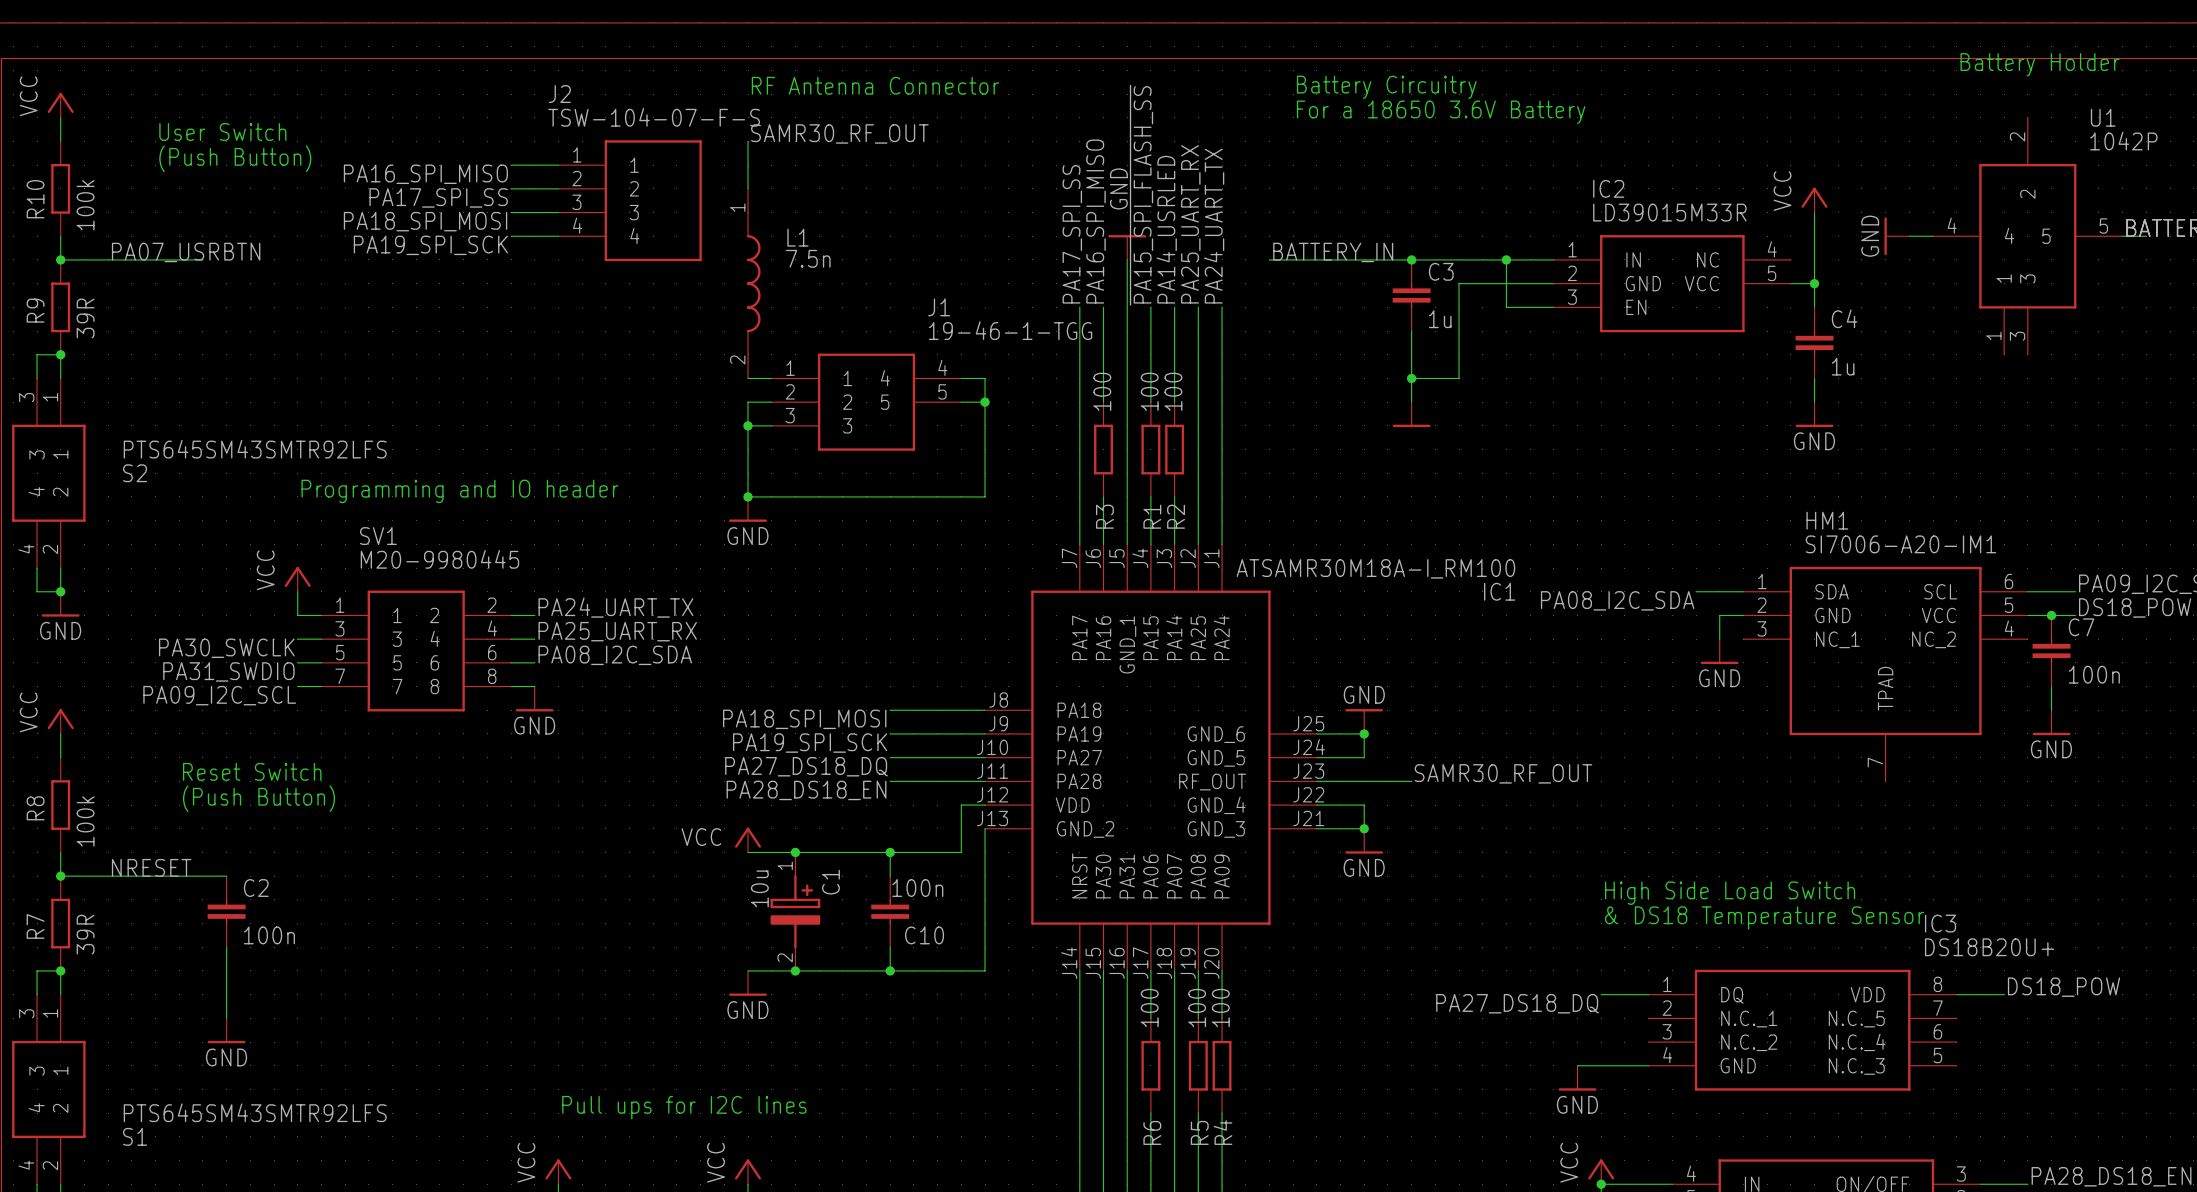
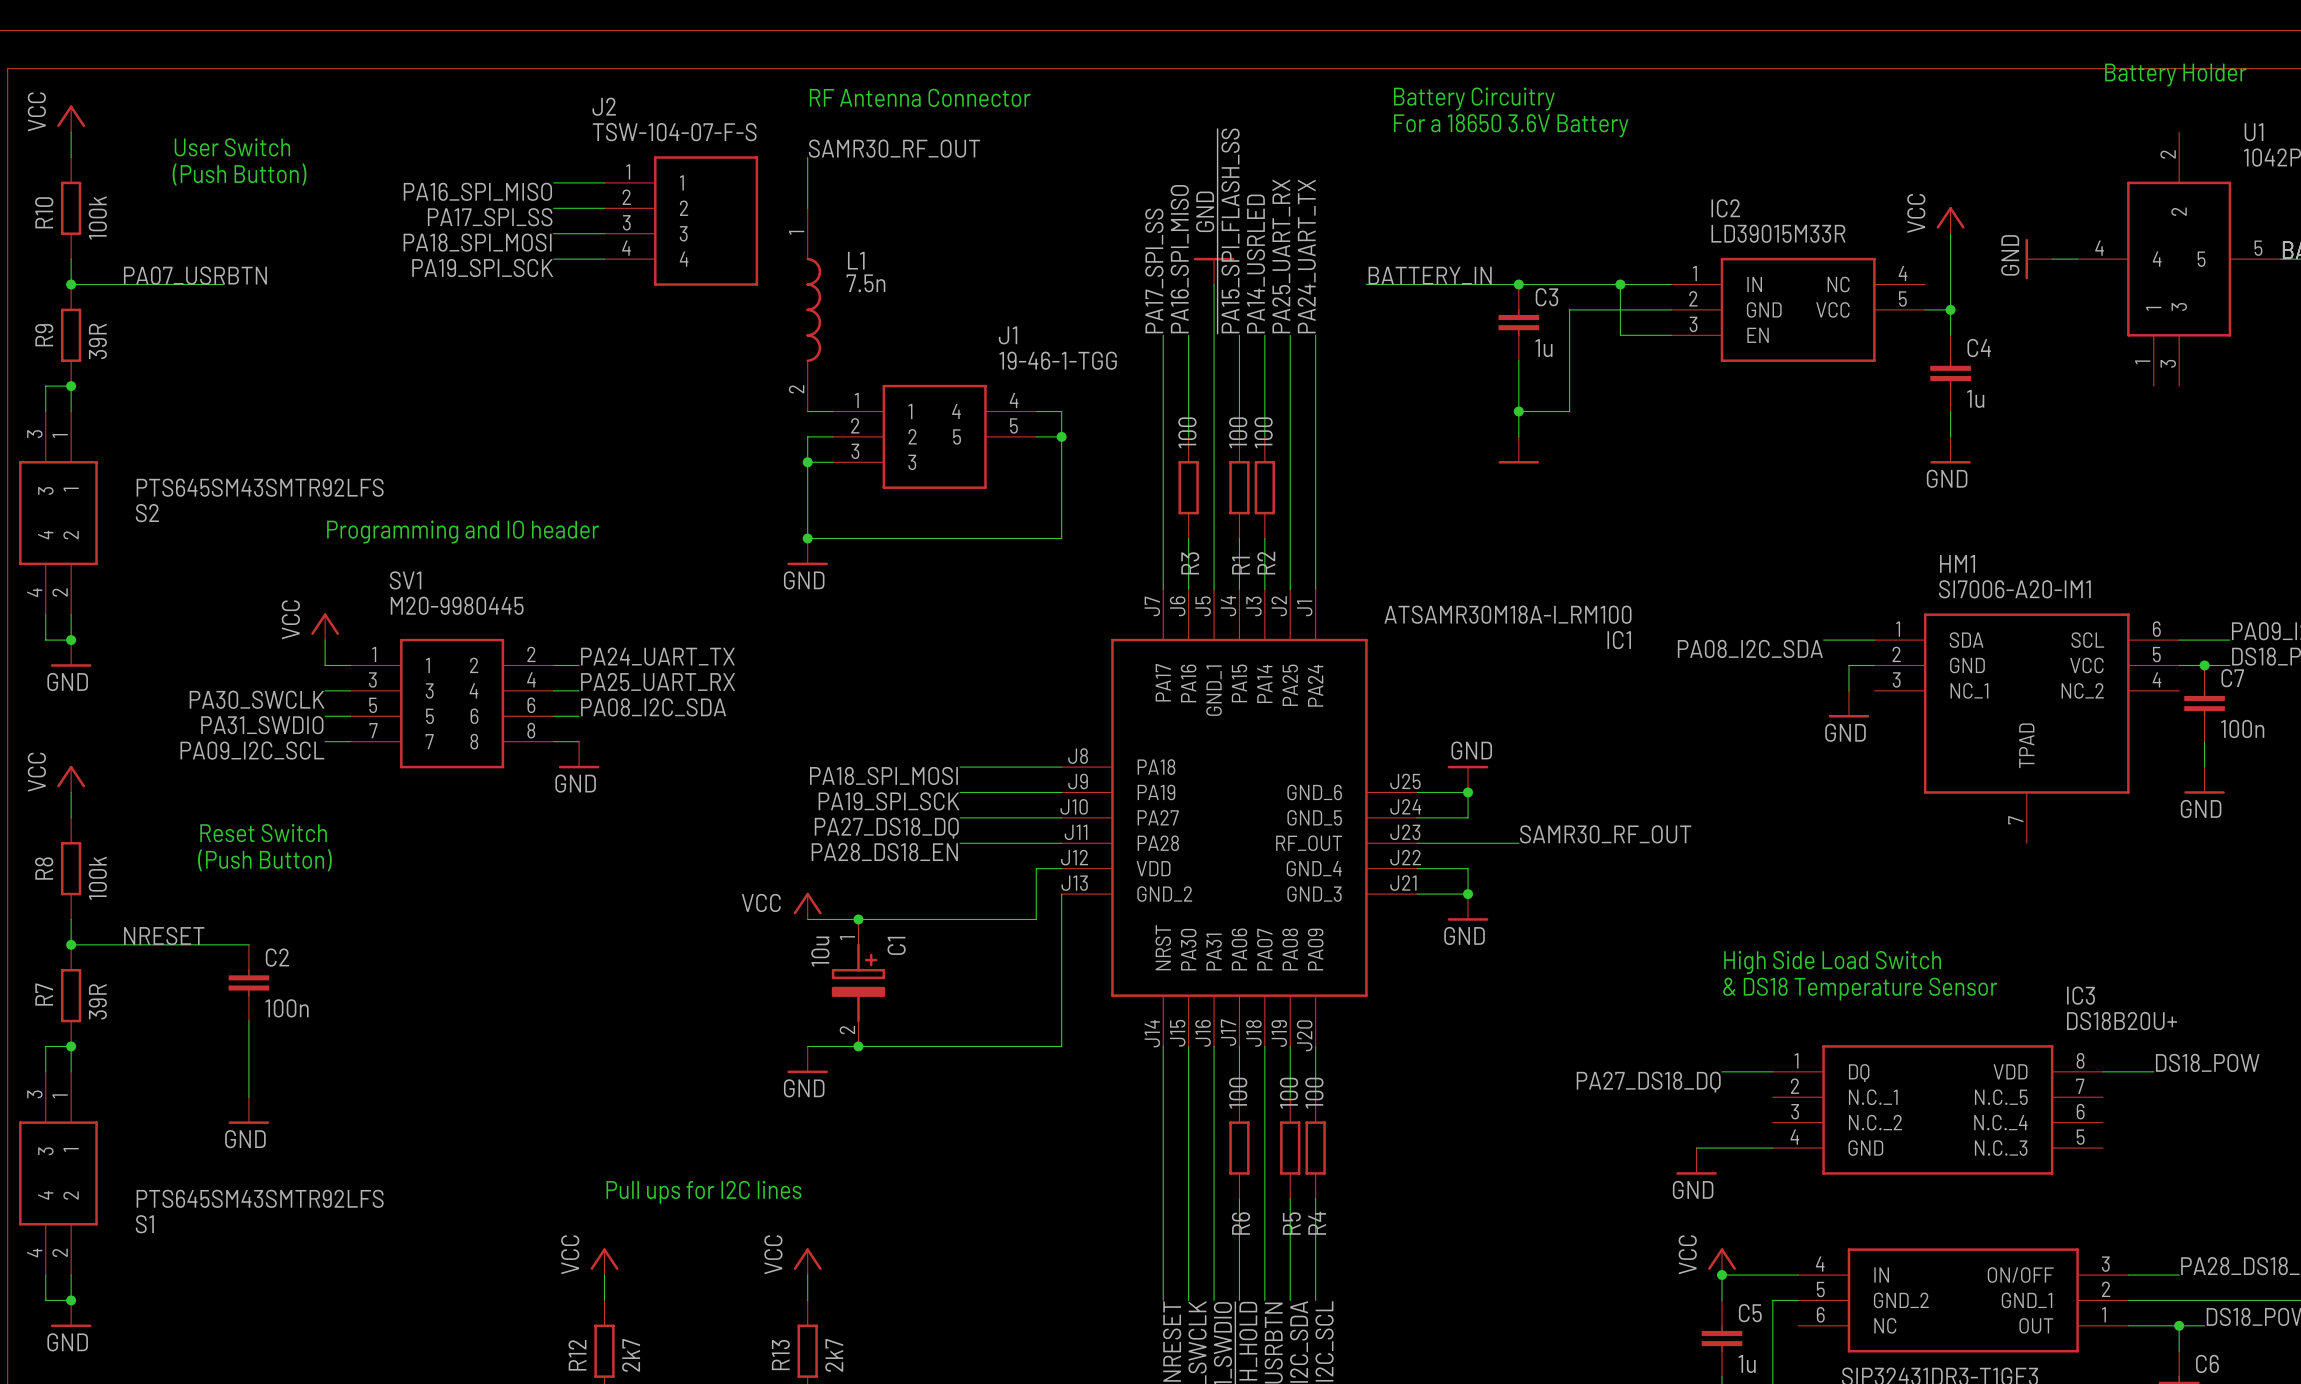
wire: (890, 852) (890, 876) -> none
junction: (890, 852) -> none
C10: 100n (890, 911) -> none
wire: (890, 947) (890, 970) -> none
junction: (890, 970) -> none

